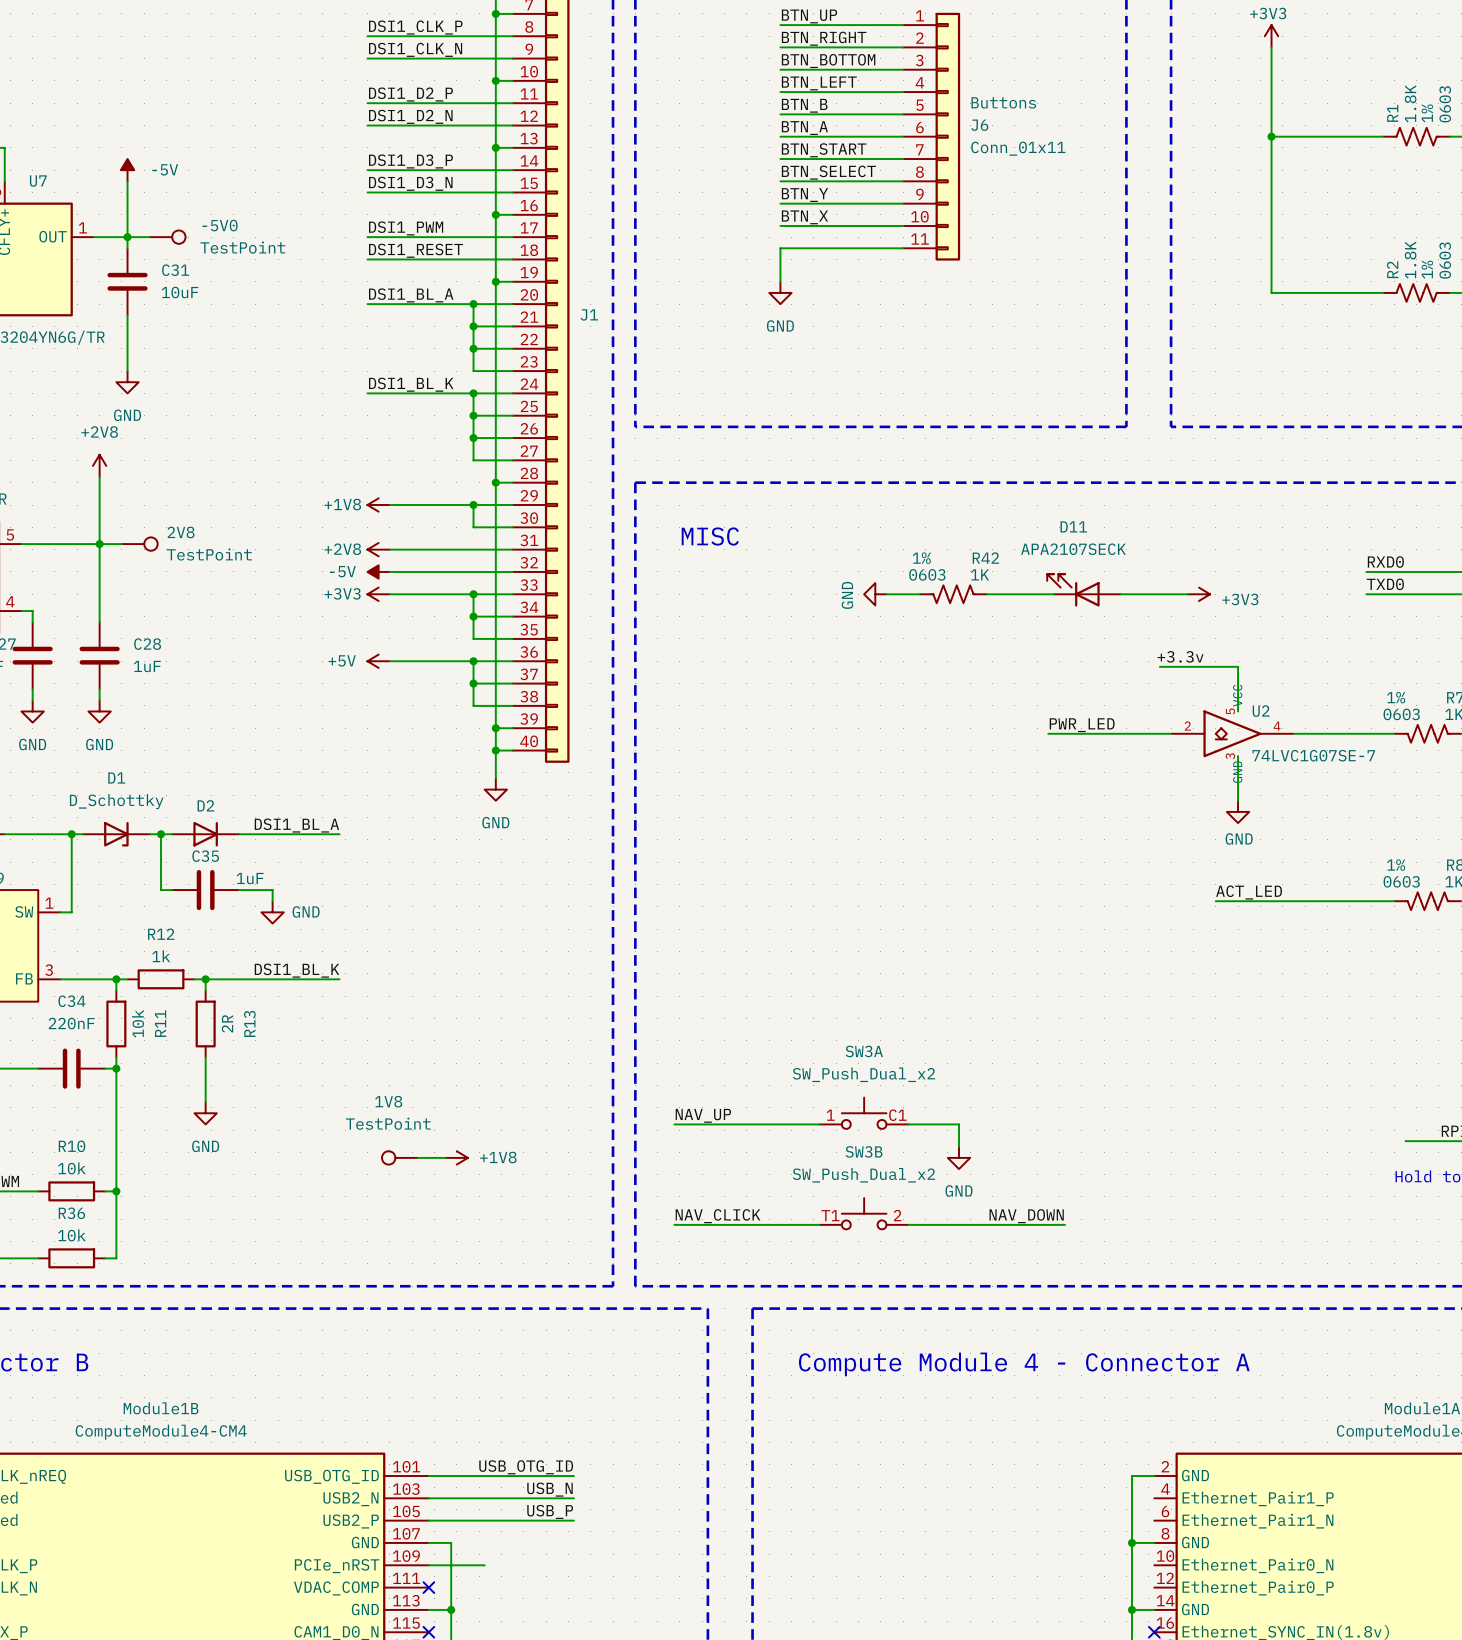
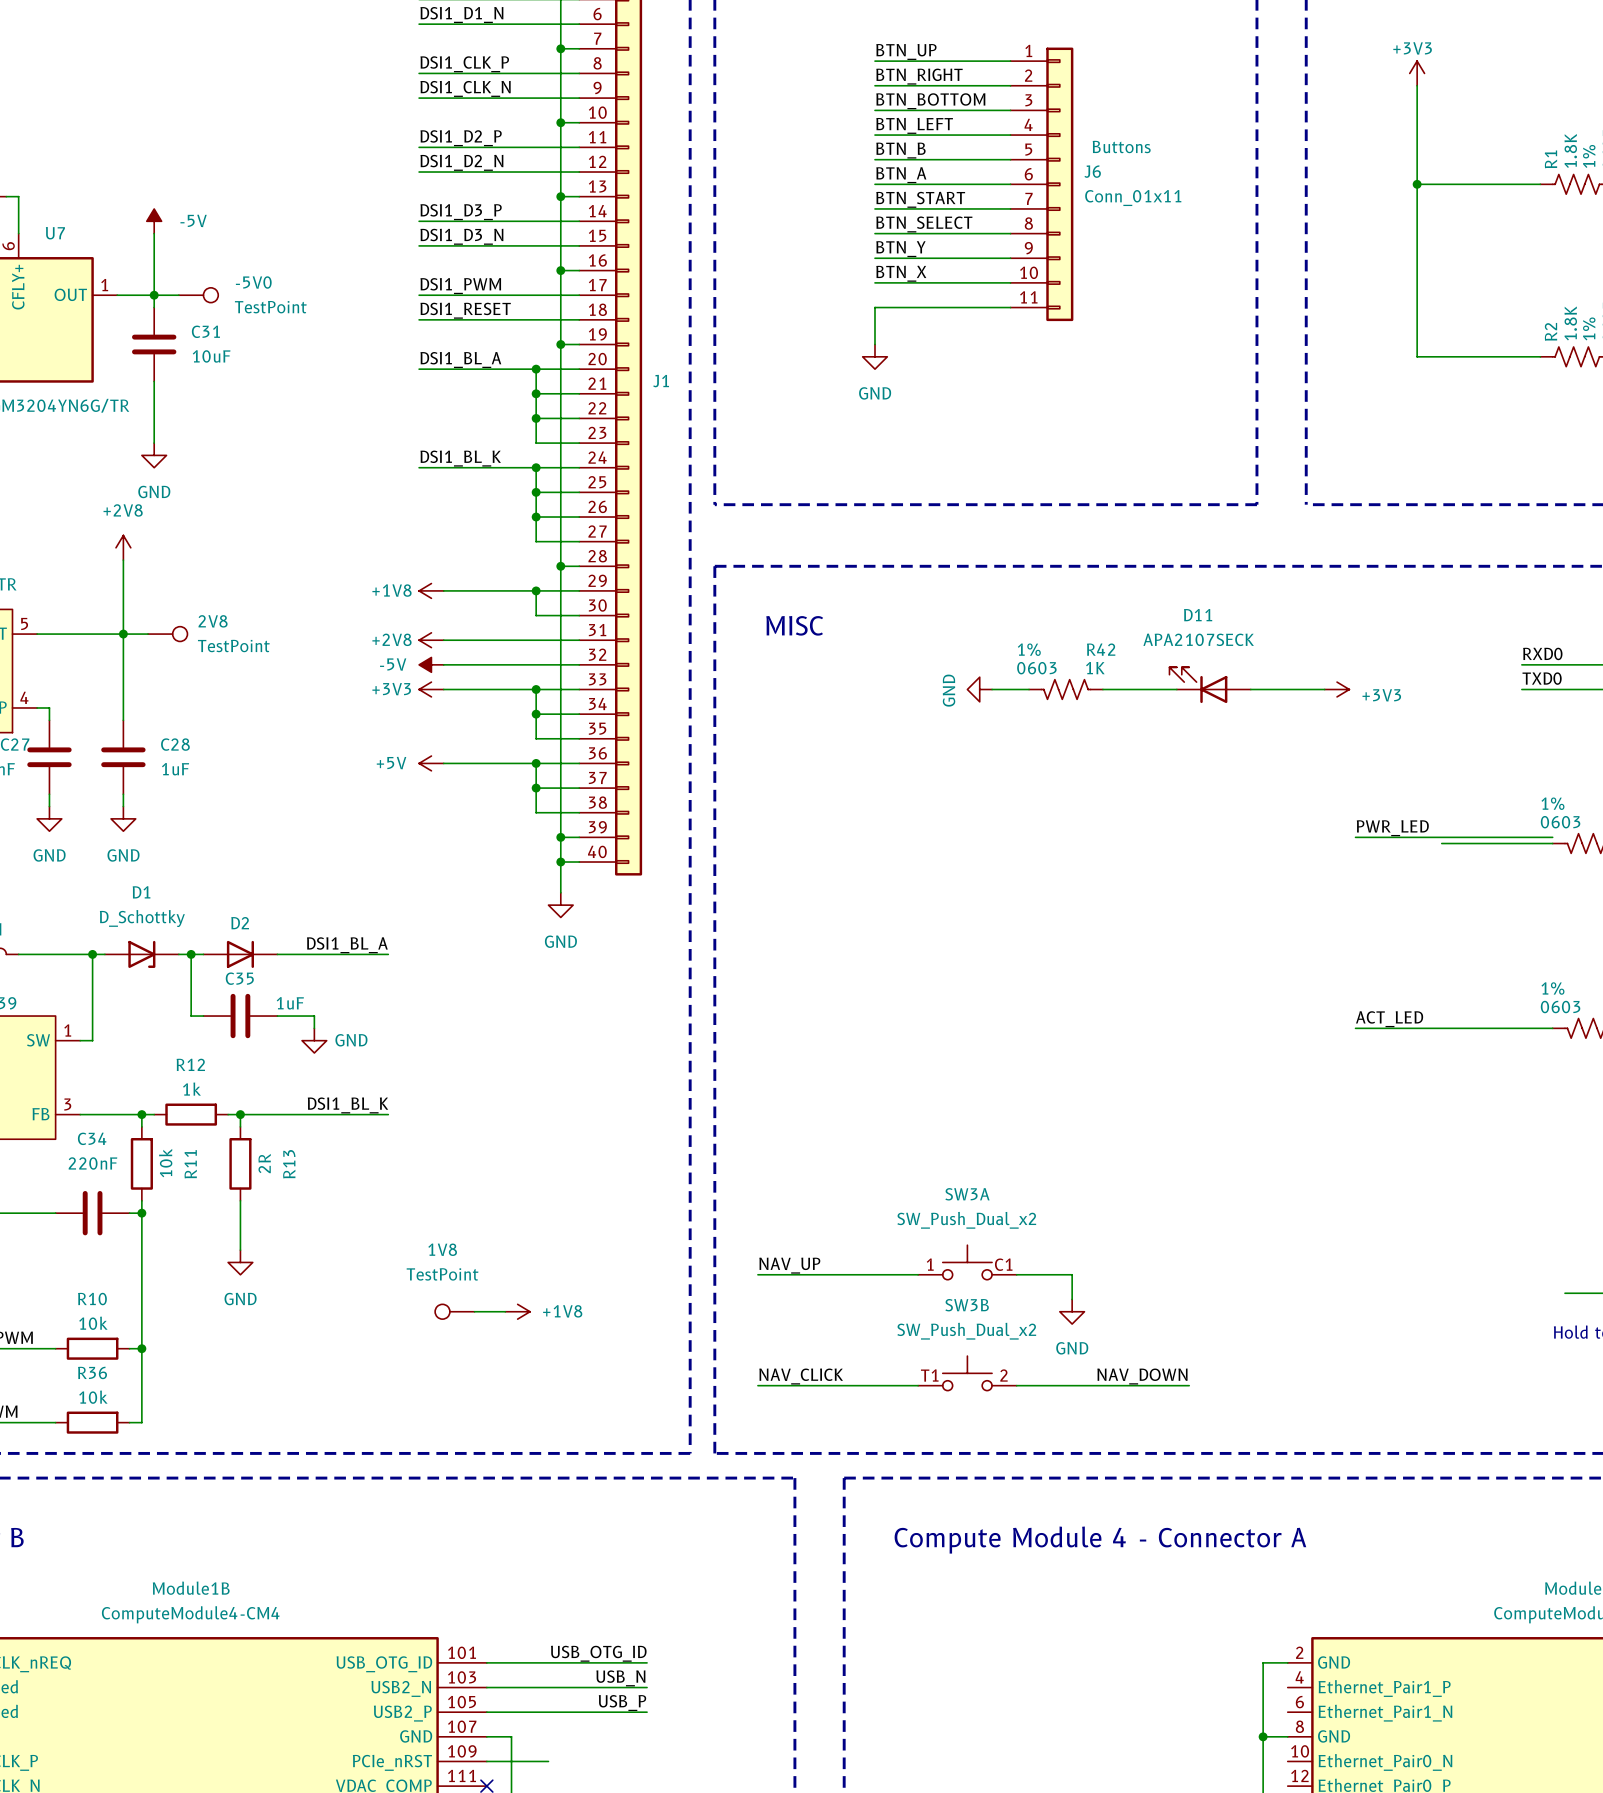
label: +3.3v (1180, 656) -> none
wire: (1159, 666) (1238, 666) (1238, 711) -> none
label position: PWR_LED (1082, 725) -> PWR_LED (1392, 828)
wire: none -> (1355, 837) (1552, 837)
wire: (1048, 733) (1171, 733) -> none
U2: 74LVC1G07SE-7 (1232, 733) -> none
wire: (1238, 756) (1238, 800) -> none
power symbol: GND (1238, 811) -> none

